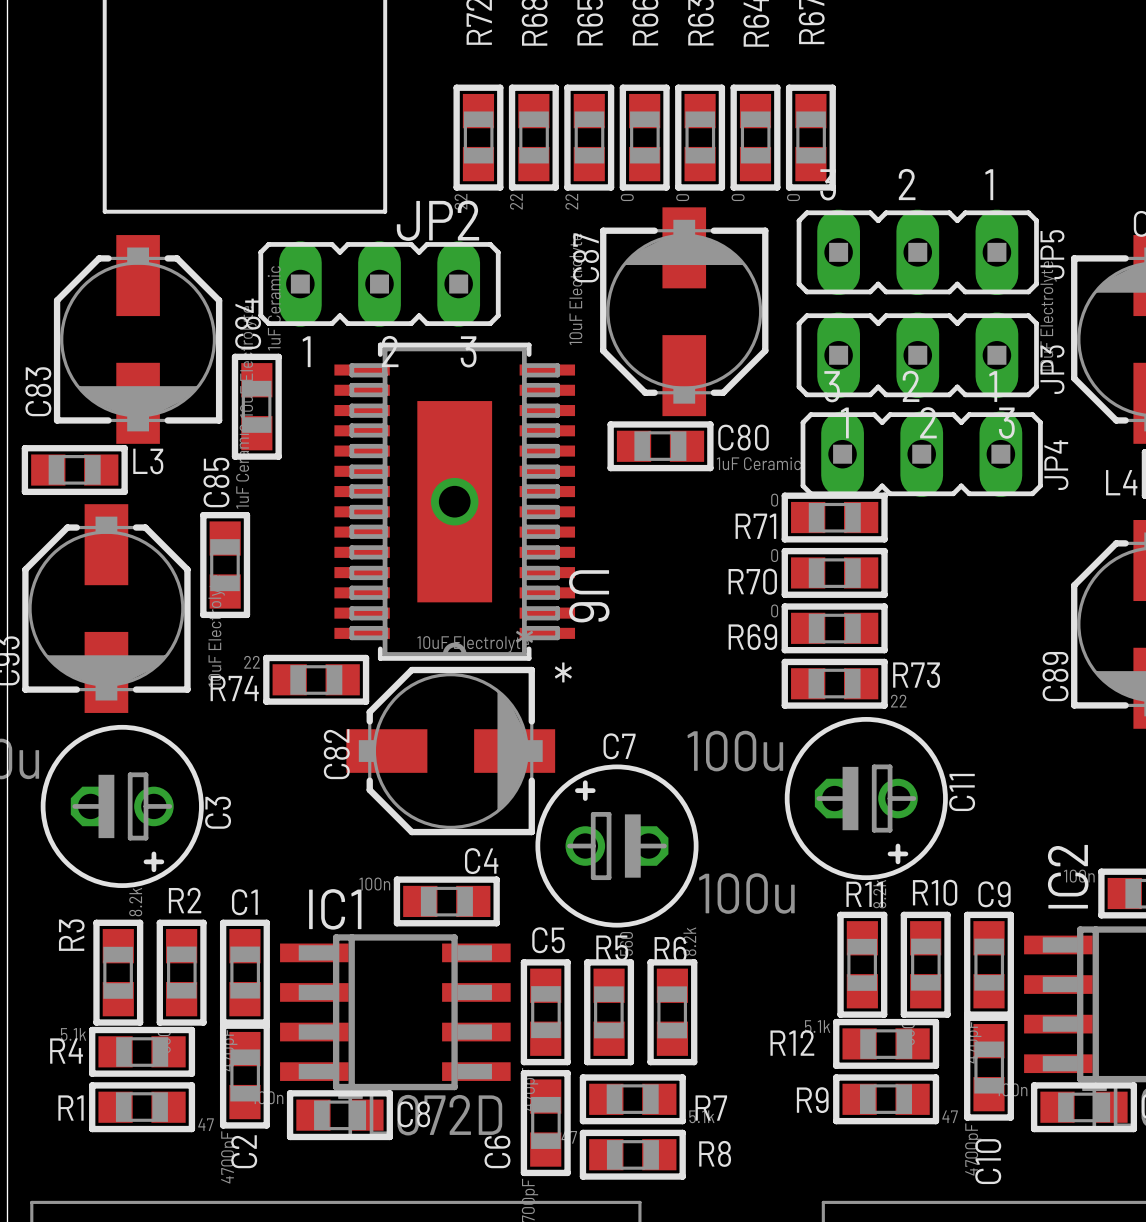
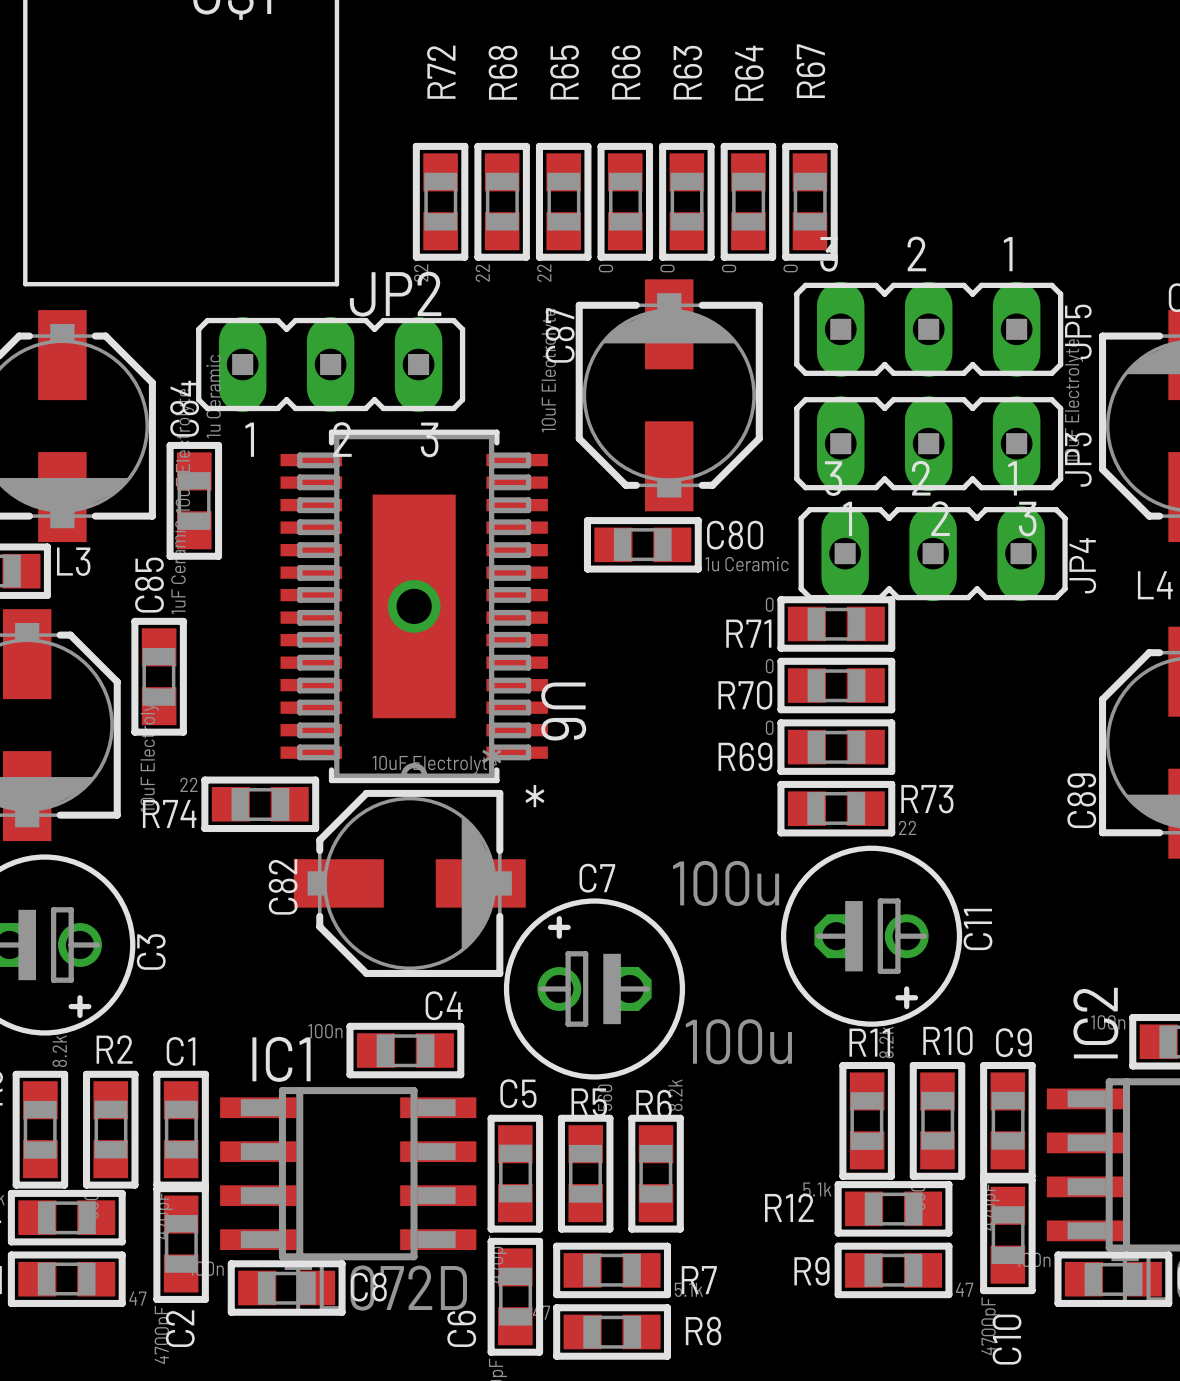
C84 value: 1uF Ceramic (274, 308) -> 1u Ceramic (213, 396)
C80 value: 1uF Ceramic (758, 463) -> 1u Ceramic (747, 564)

